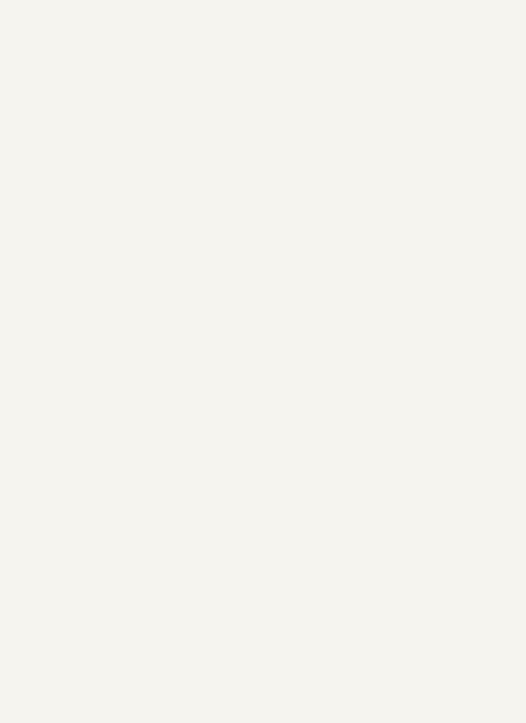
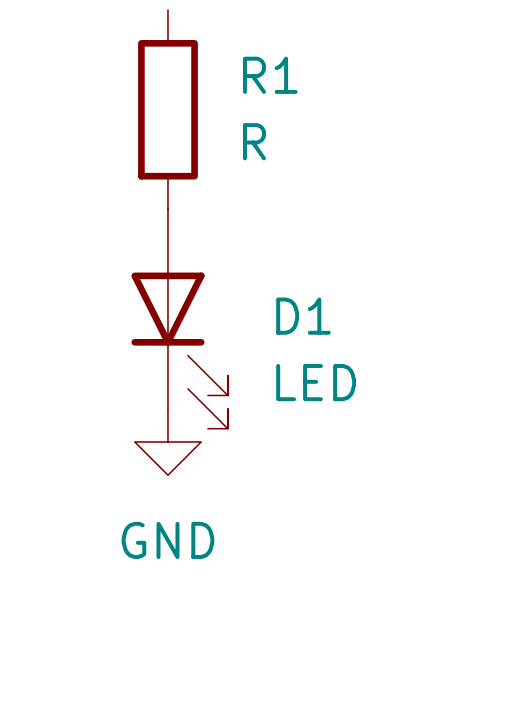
R1: none -> R (167, 109)
D1: none -> LED (179, 319)
power symbol: none -> GND (167, 441)

